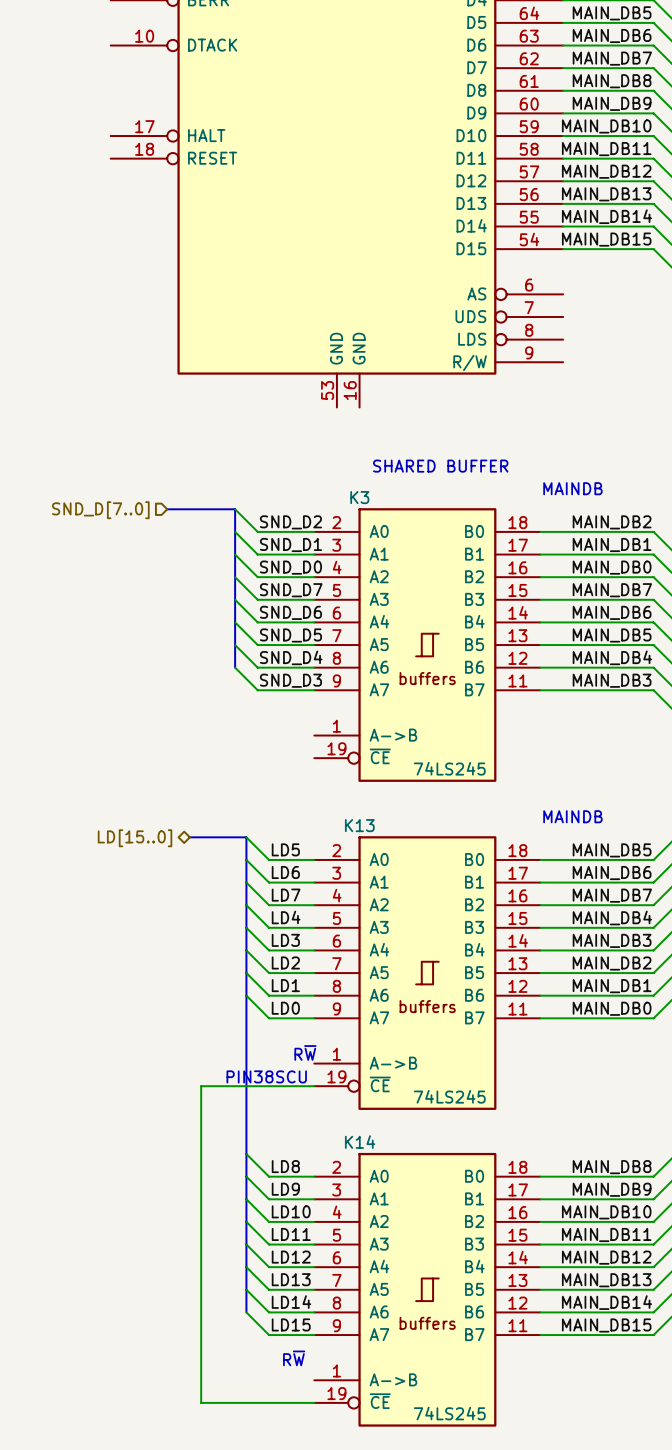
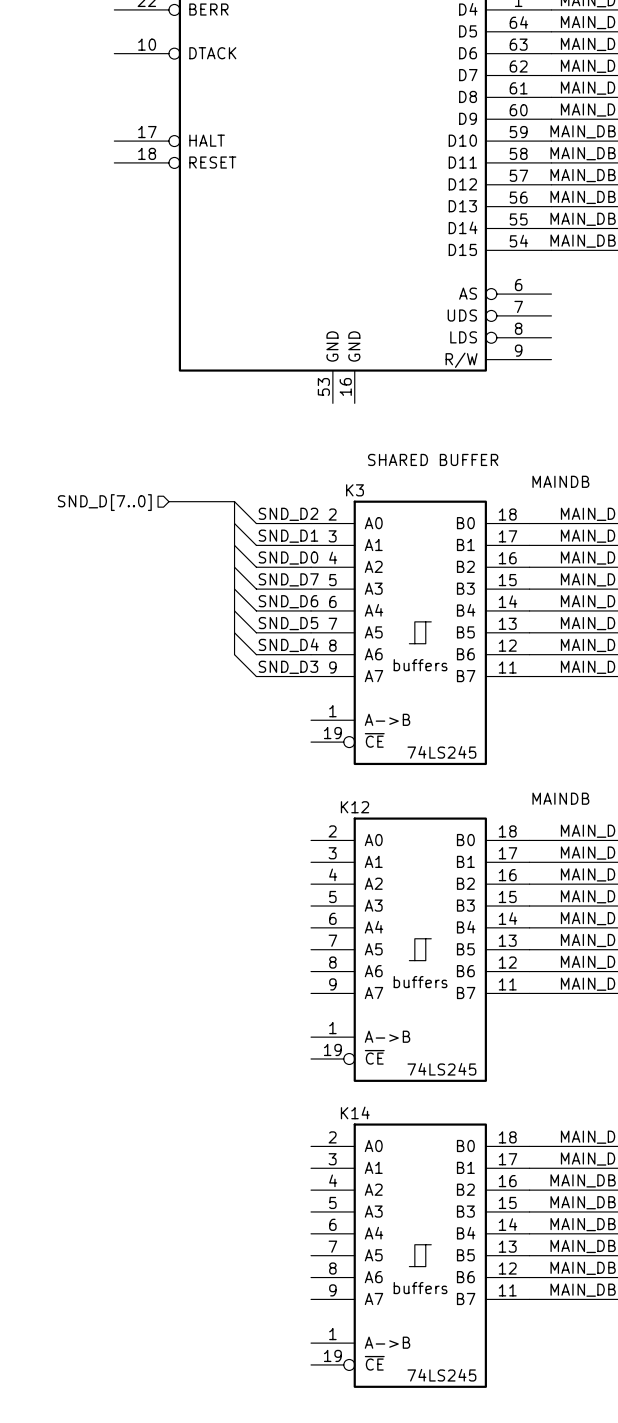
K13 name: K13 (359, 825) -> K12 (355, 807)
bus: (189, 837) (246, 837) (246, 1312) -> none
wire: (246, 837) (269, 859) (314, 859) -> none
hierarchical label: LD[15..0] (135, 838) -> none
label: LD5 (285, 849) -> none
wire: (246, 859) (269, 882) (314, 882) -> none
label: LD6 (285, 872) -> none
wire: (246, 882) (269, 905) (314, 905) -> none
label: LD7 (286, 895) -> none
wire: (246, 905) (269, 927) (314, 927) -> none
label: LD4 (286, 917) -> none
wire: (246, 927) (269, 950) (314, 950) -> none
label: LD3 (285, 940) -> none
wire: (246, 950) (269, 973) (314, 973) -> none
label: LD2 (285, 962) -> none
wire: (246, 973) (269, 995) (314, 995) -> none
label: LD1 (285, 985) -> none
wire: (246, 995) (269, 1018) (314, 1018) -> none
label: LD0 (285, 1008) -> none
text: R~{W} (305, 1052) -> none
text: PIN38SCU (266, 1076) -> none
wire: (314, 1086) (201, 1086) (201, 1402) (314, 1402) -> none
wire: (246, 1154) (269, 1176) (314, 1176) -> none
label: LD8 (285, 1166) -> none
wire: (246, 1176) (269, 1199) (314, 1199) -> none
label: LD9 (285, 1189) -> none
wire: (246, 1199) (269, 1221) (314, 1221) -> none
label: LD10 (291, 1211) -> none
wire: (246, 1221) (269, 1244) (314, 1244) -> none
label: LD11 (291, 1234) -> none
wire: (246, 1244) (269, 1267) (314, 1267) -> none
label: LD12 (291, 1257) -> none
wire: (246, 1267) (269, 1289) (314, 1289) -> none
label: LD13 (291, 1279) -> none
wire: (246, 1289) (269, 1312) (314, 1312) -> none
label: LD14 (291, 1302) -> none
wire: (246, 1312) (269, 1335) (314, 1335) -> none
label: LD15 (291, 1324) -> none
text: R~{W} (294, 1358) -> none

